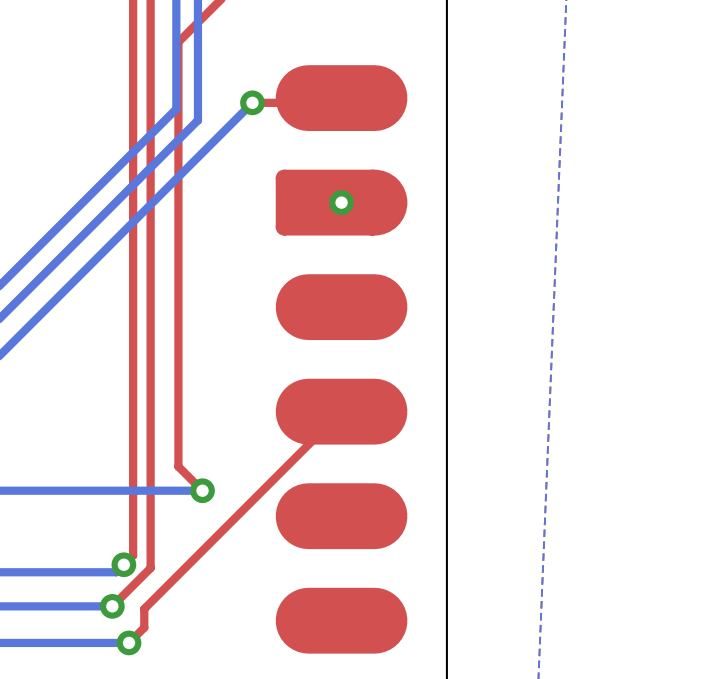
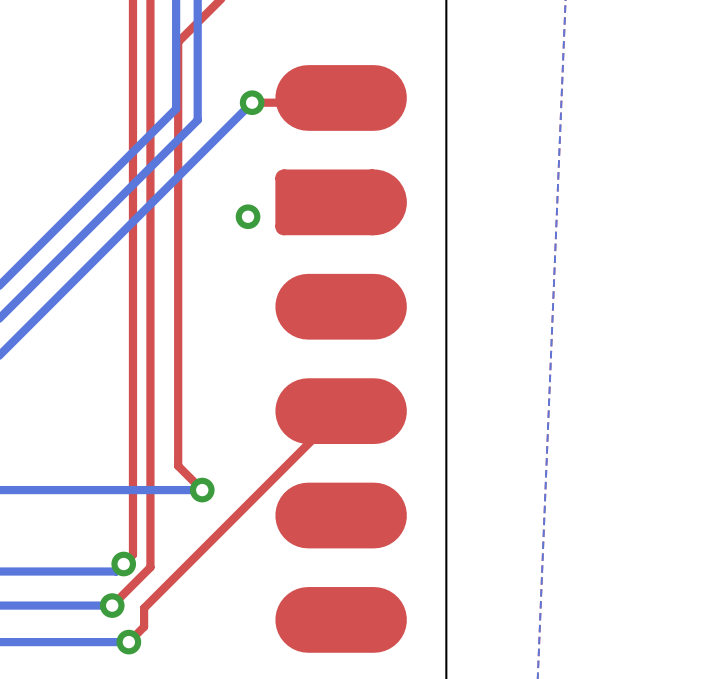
via position: (341, 202) -> (248, 216)

